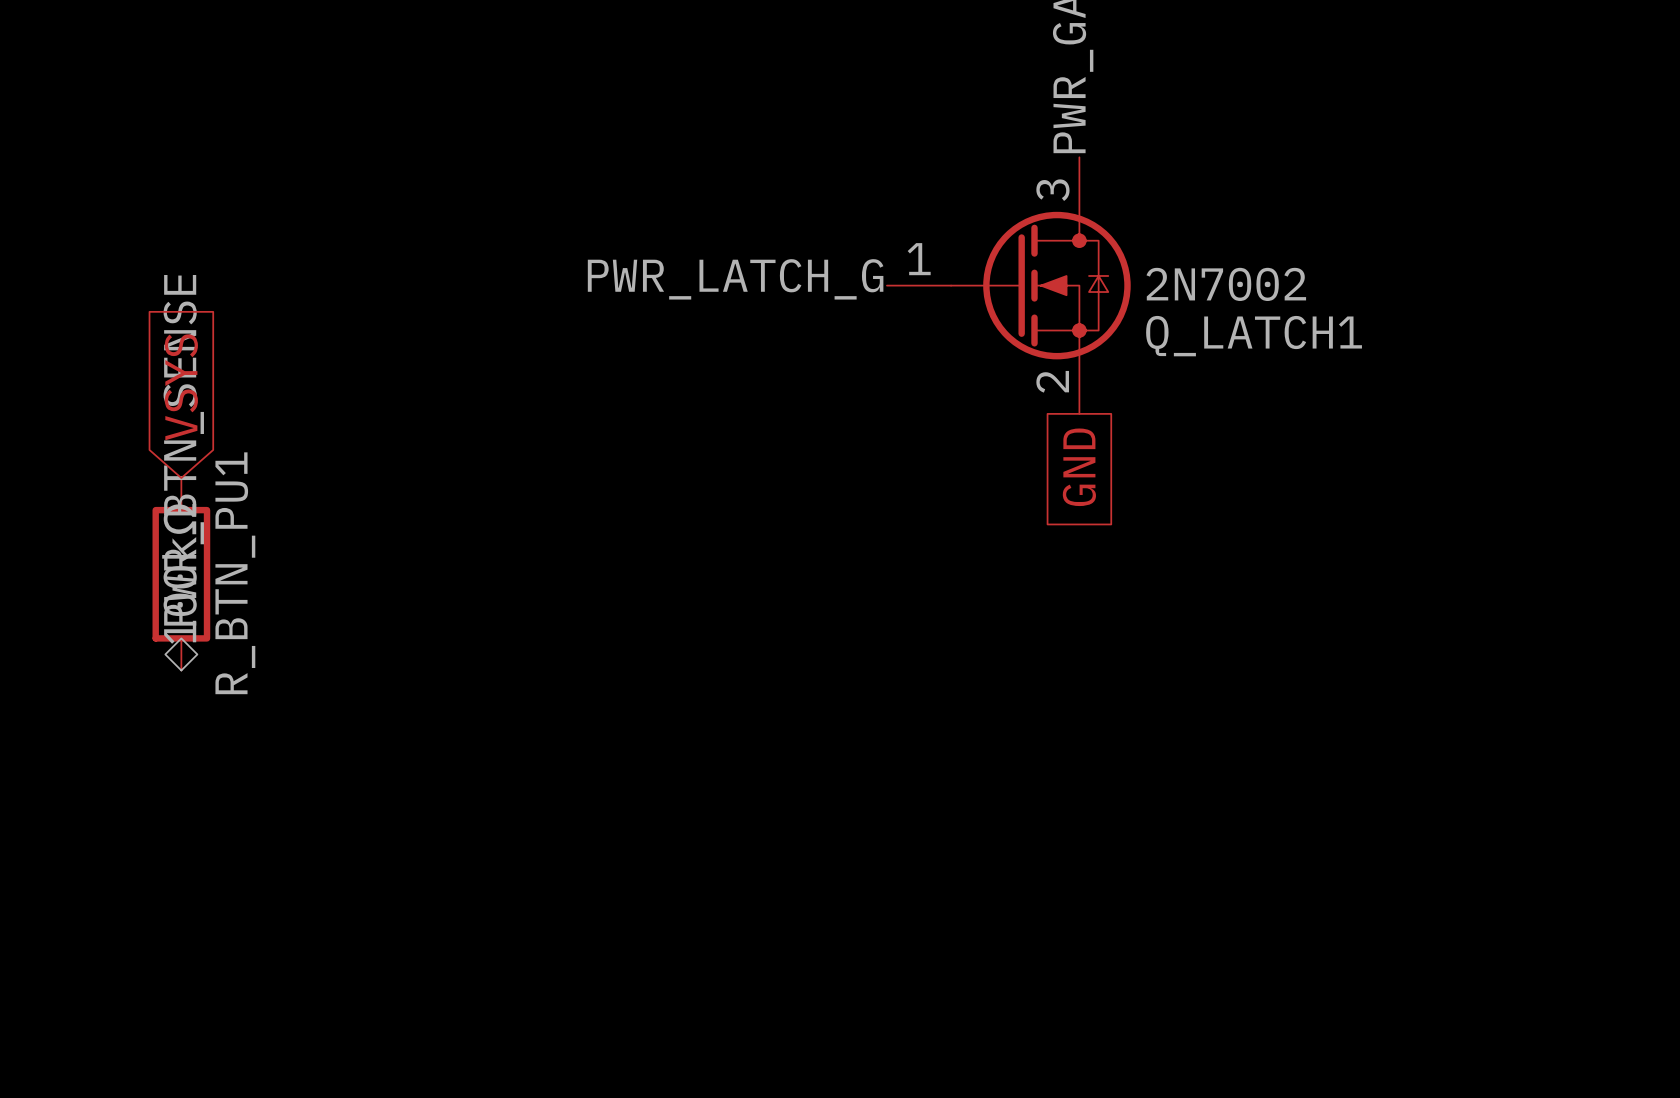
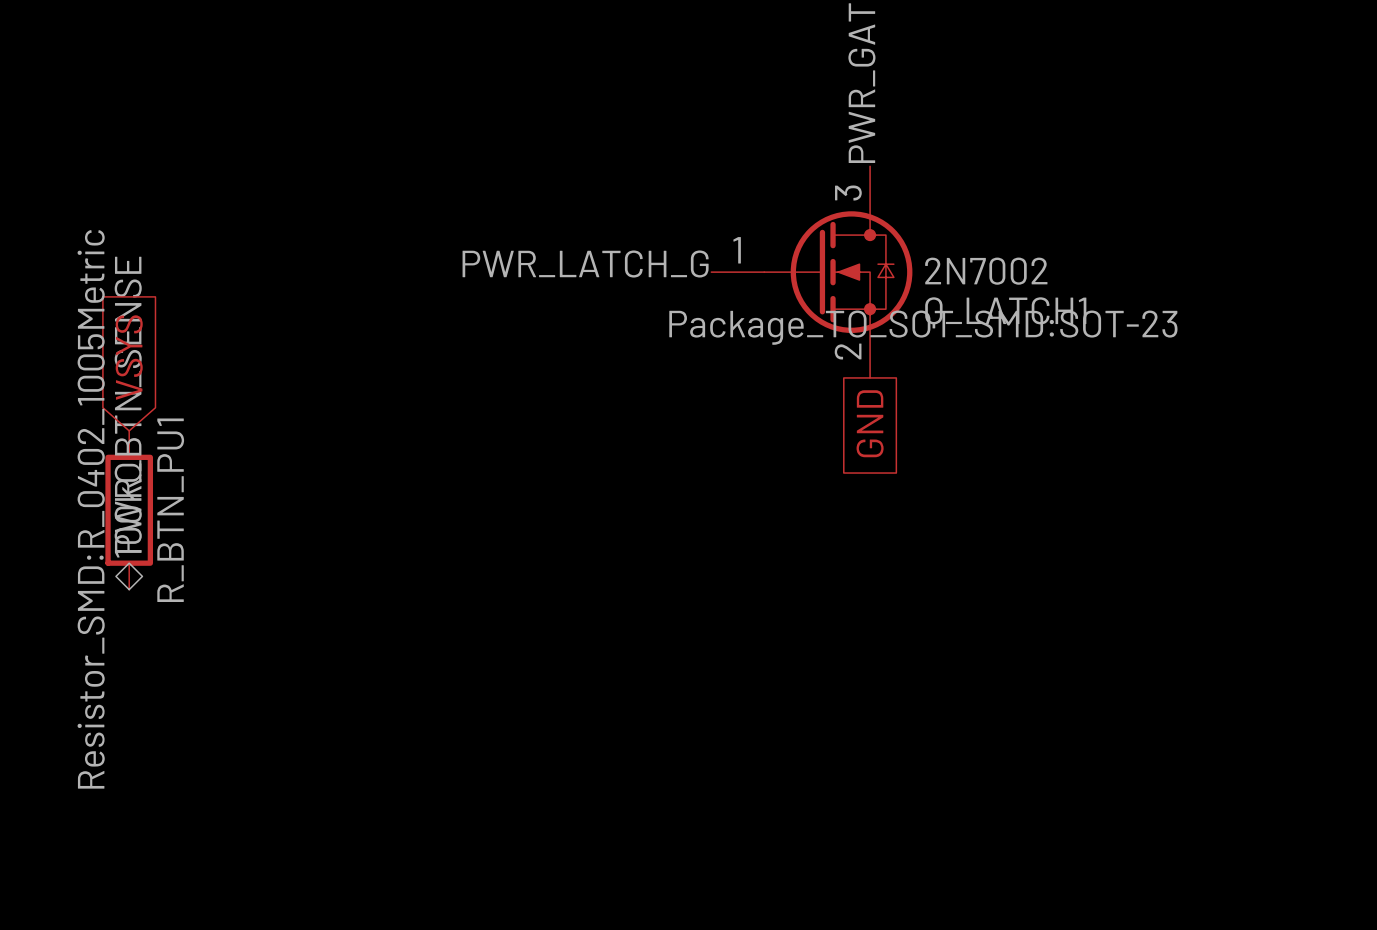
Q_LATCH1 text: none -> Package_TO_SOT_SMD:SOT-23 (923, 327)
R_BTN_PU1 text: none -> Resistor_SMD:R_0402_1005Metric (91, 509)

